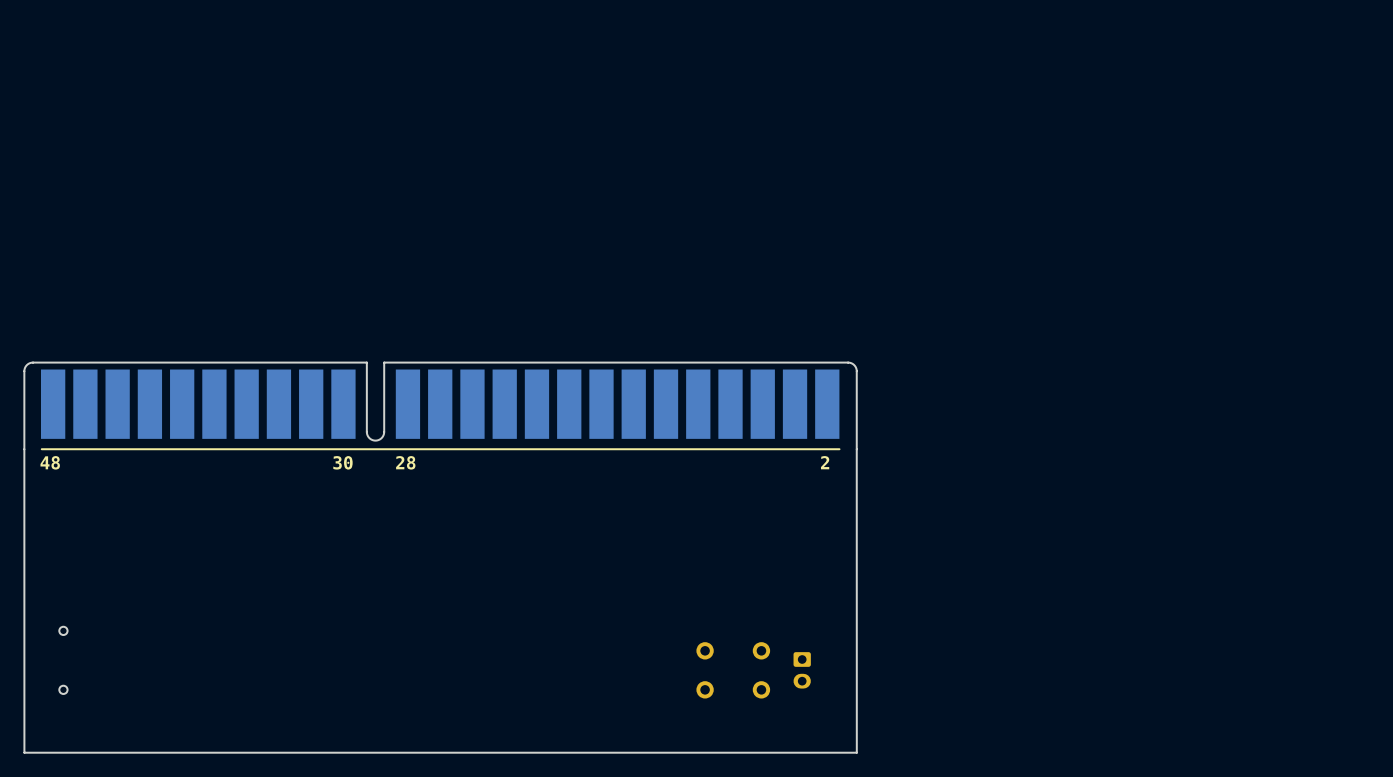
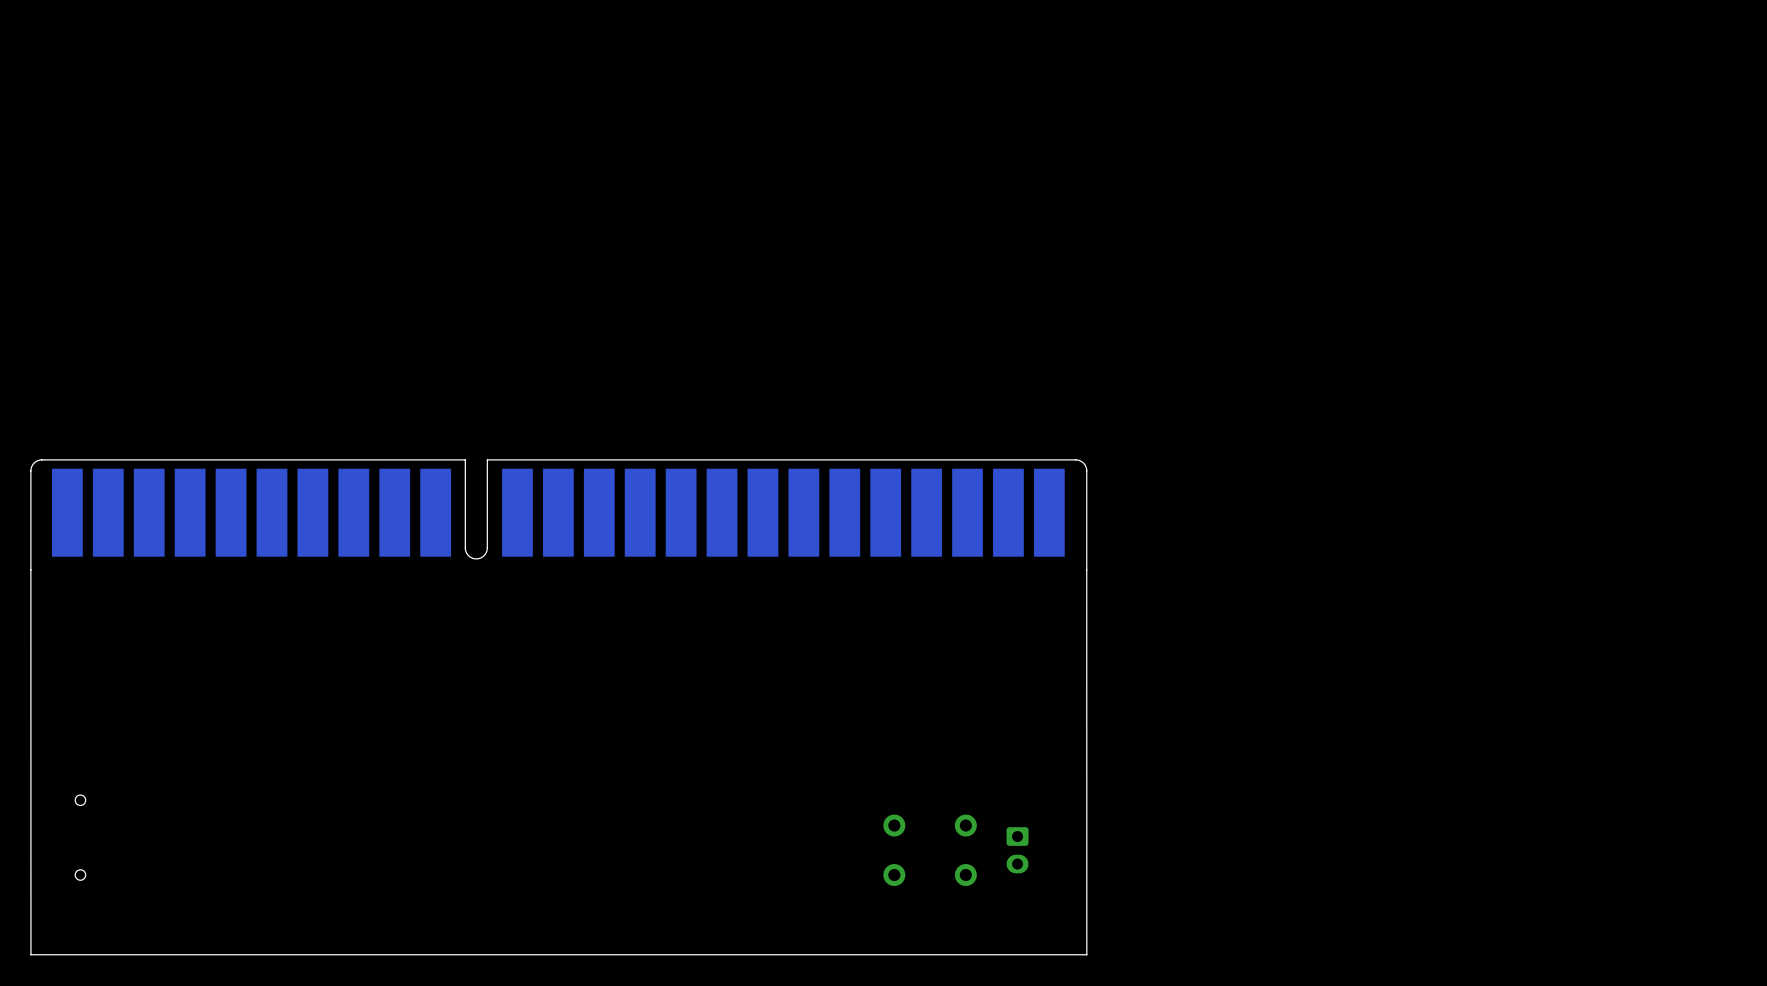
line: (839, 449) (41, 449) -> none
text: 48 (50, 462) -> none
text: 30 (342, 462) -> none
text: 28 (405, 462) -> none
text: 2 (825, 462) -> none

